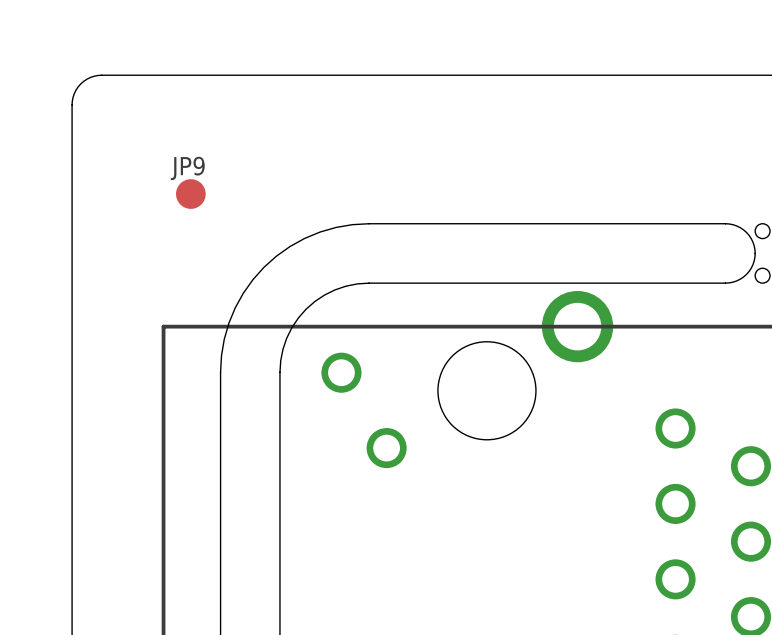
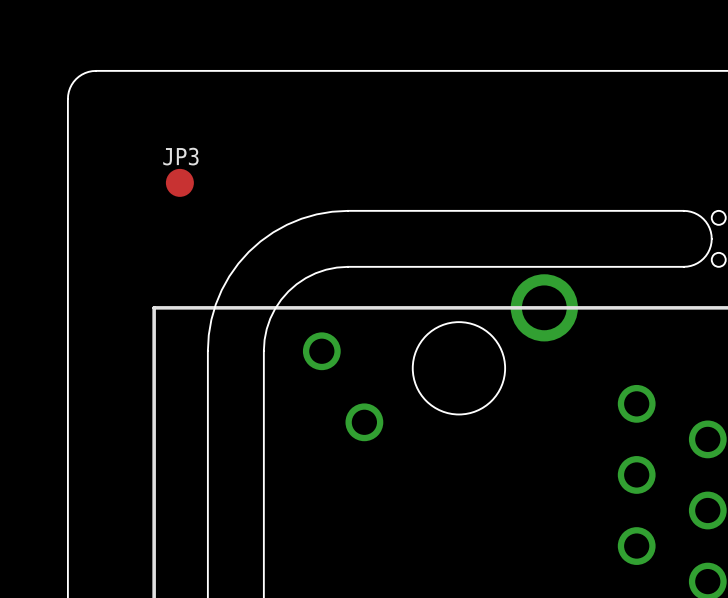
JP9 name: JP9 (187, 168) -> JP3 (180, 156)

